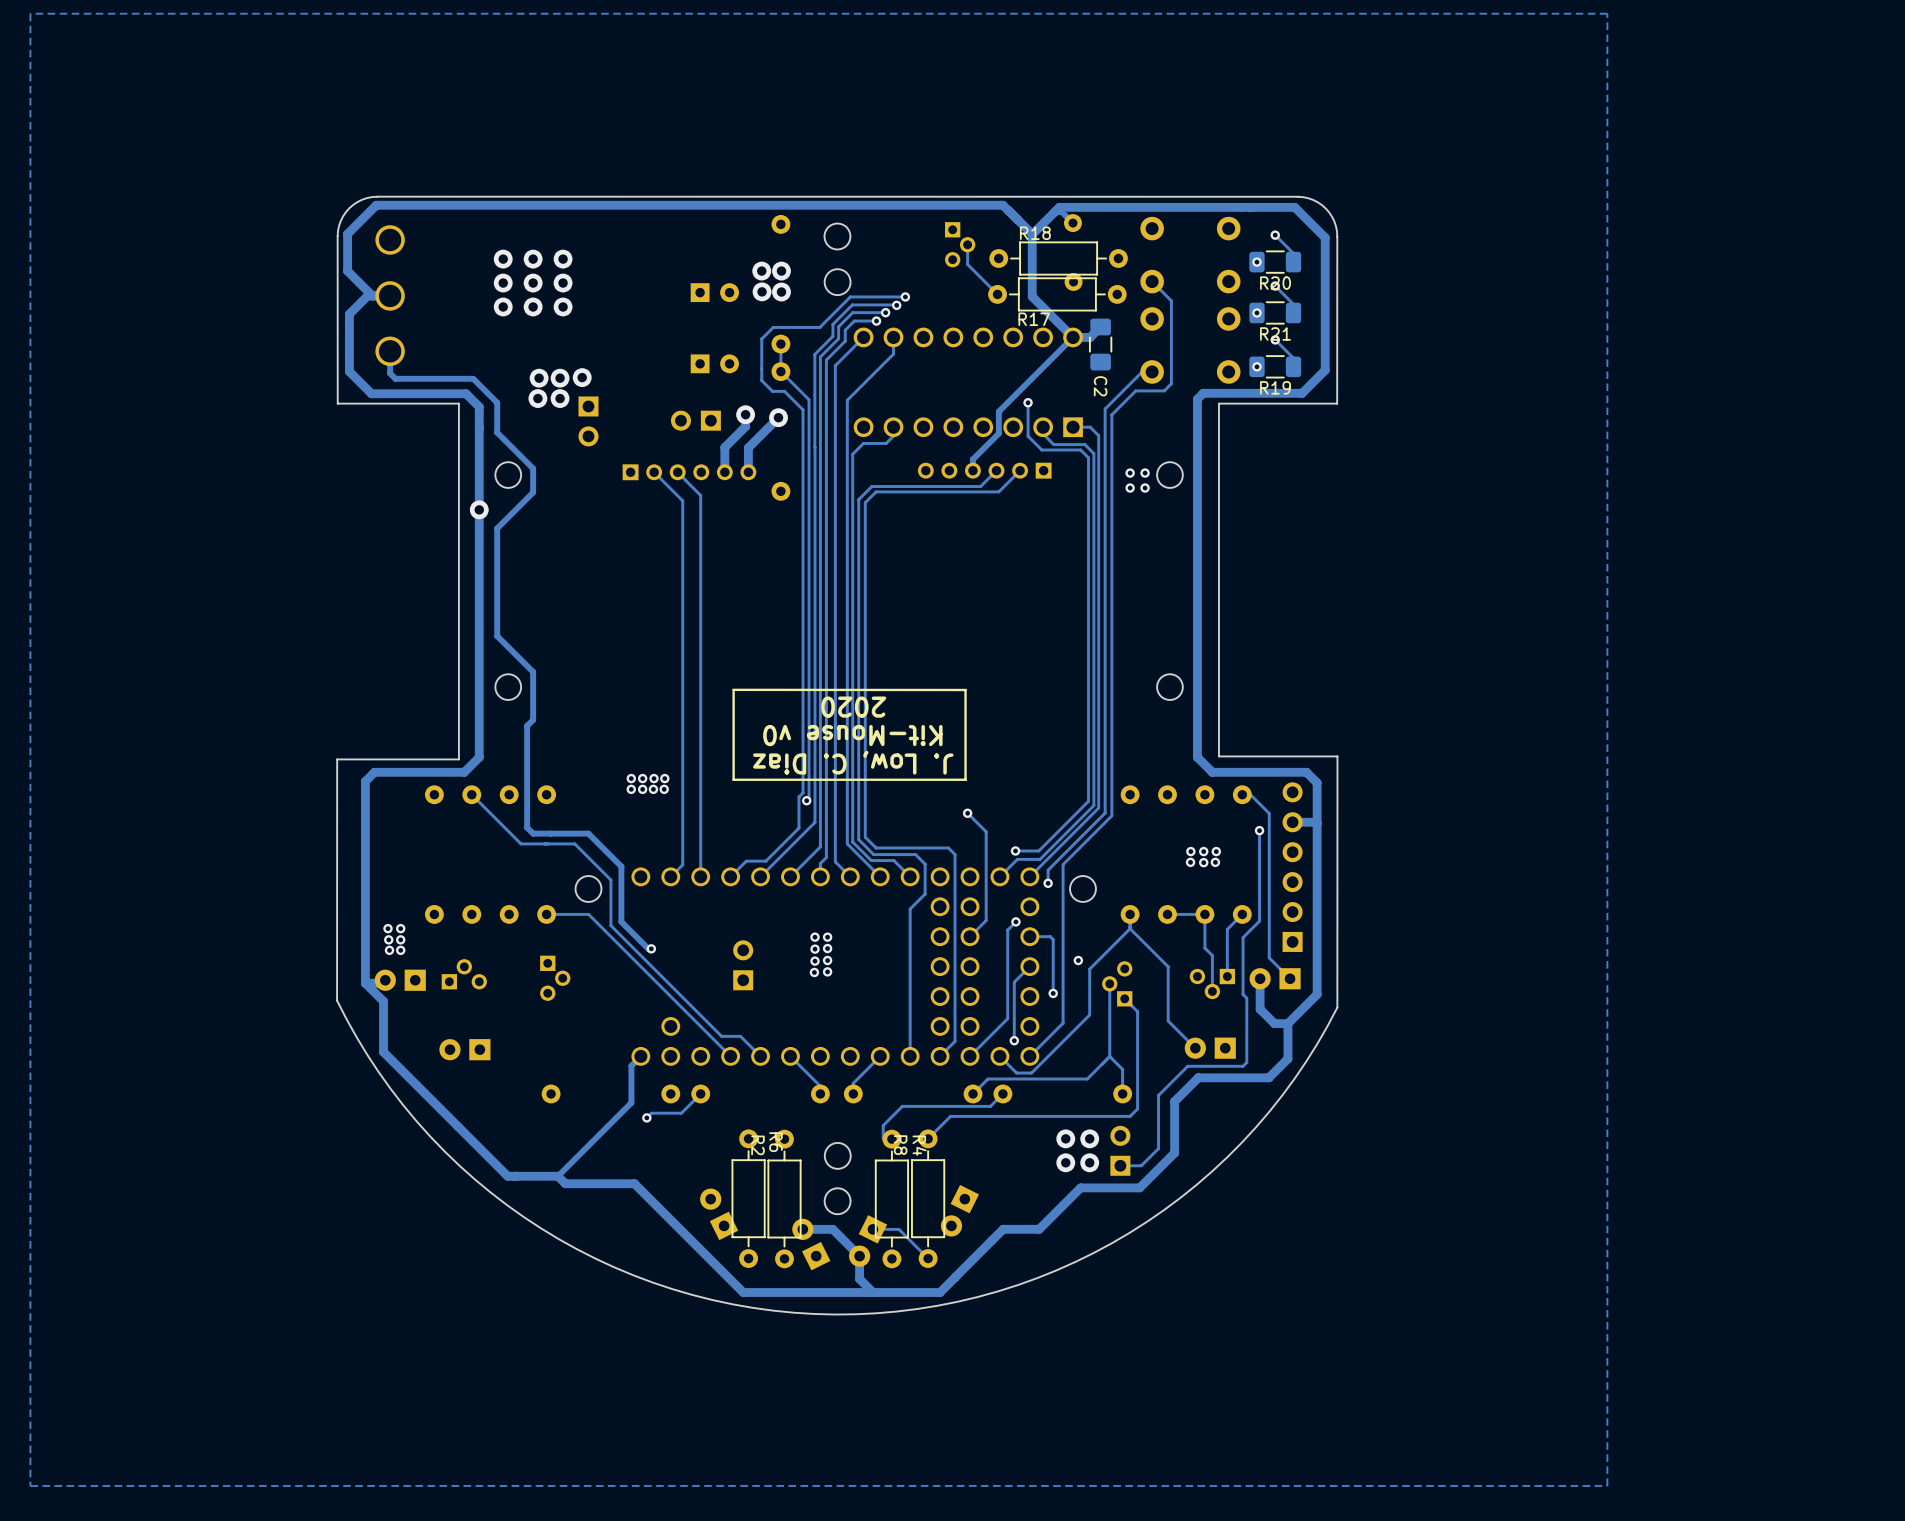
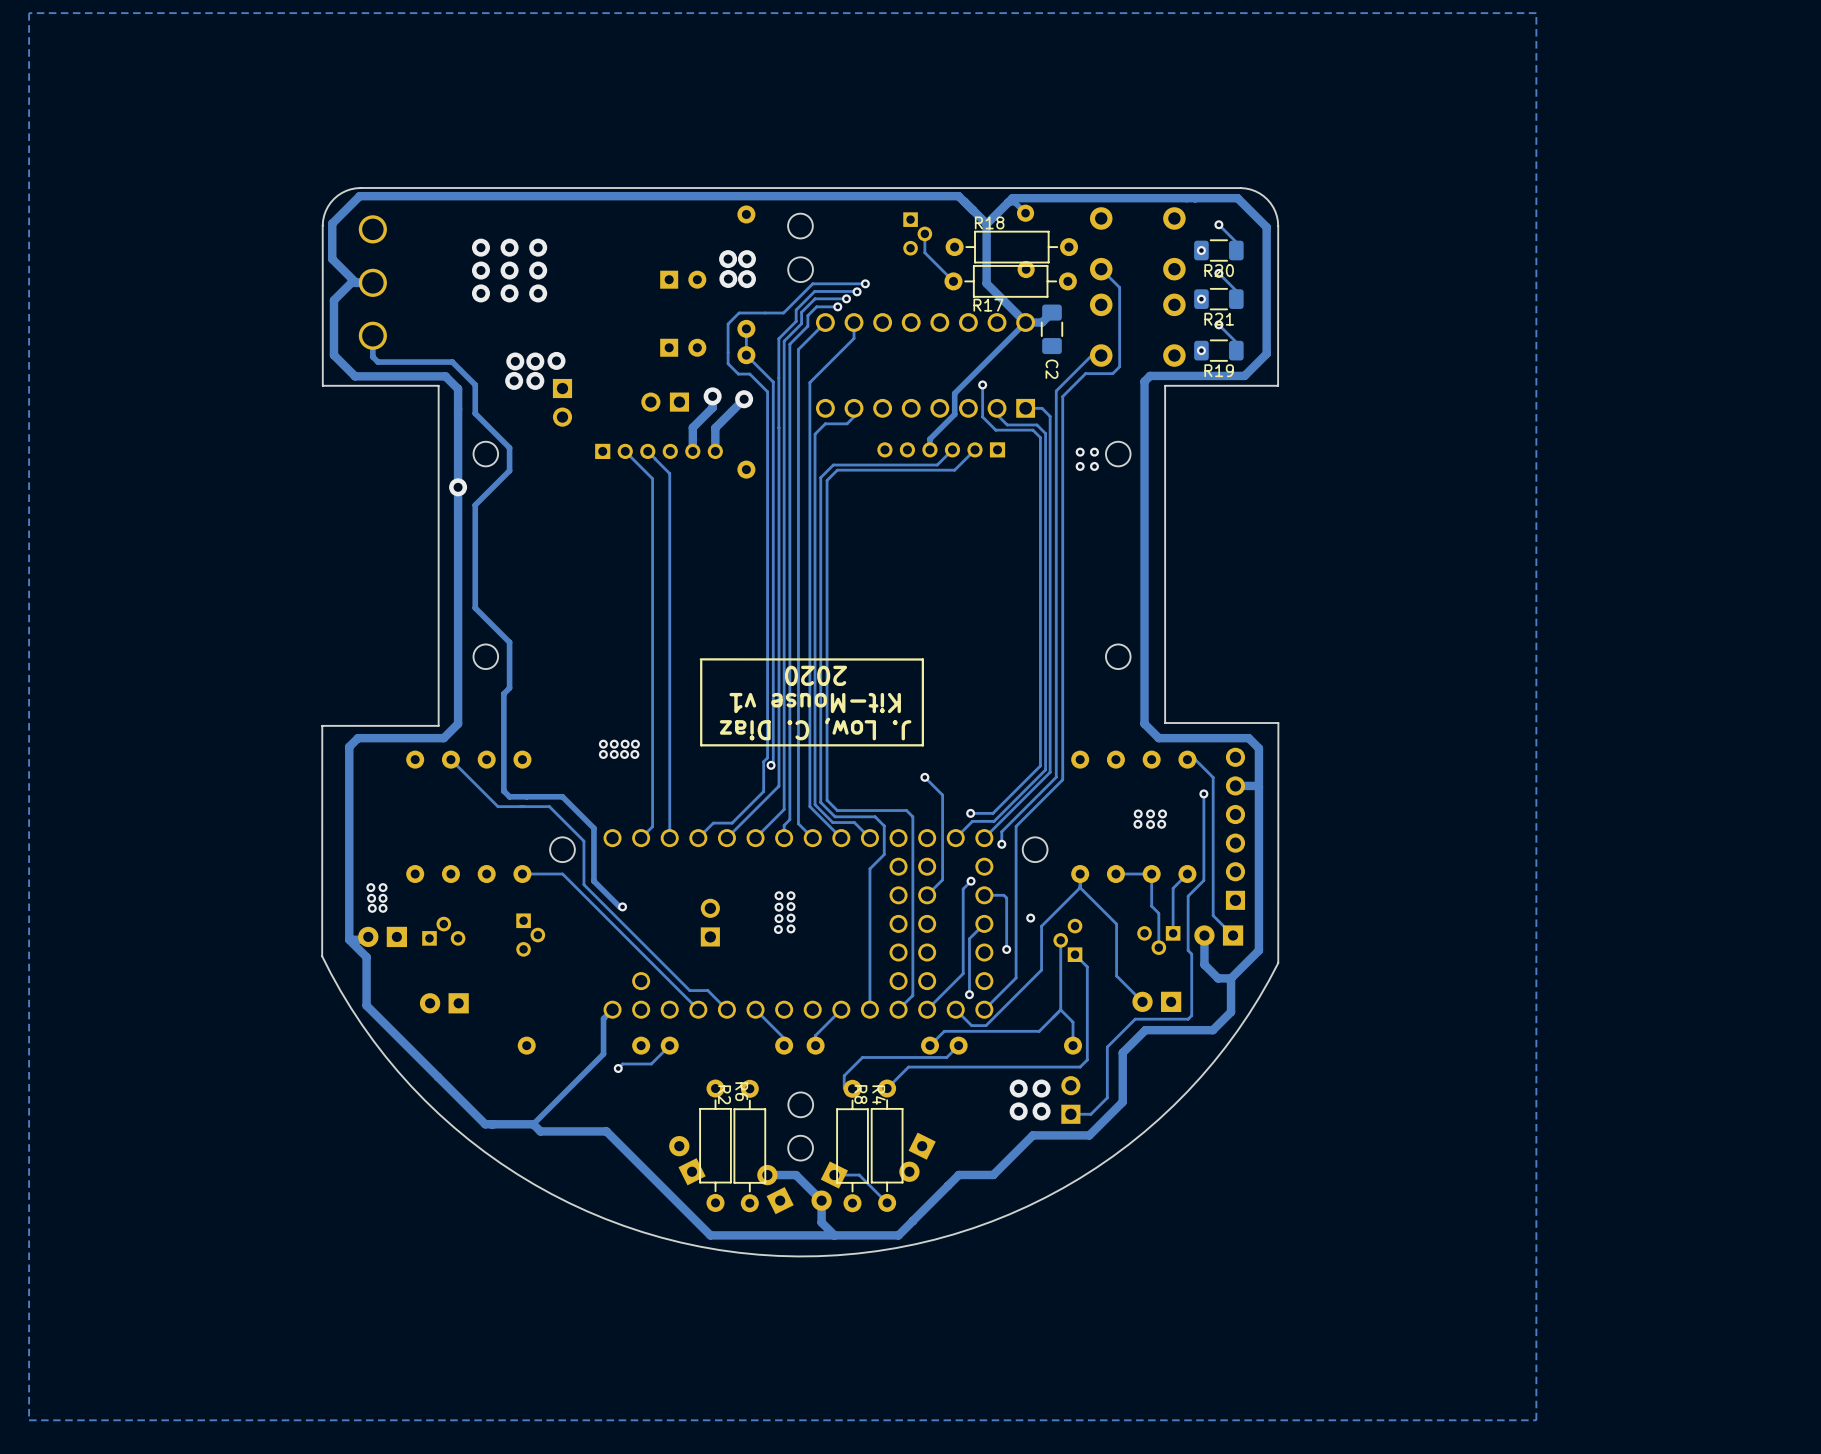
text: Kit-Mouse v0 (852, 735) -> Kit-Mouse v1 (815, 703)

